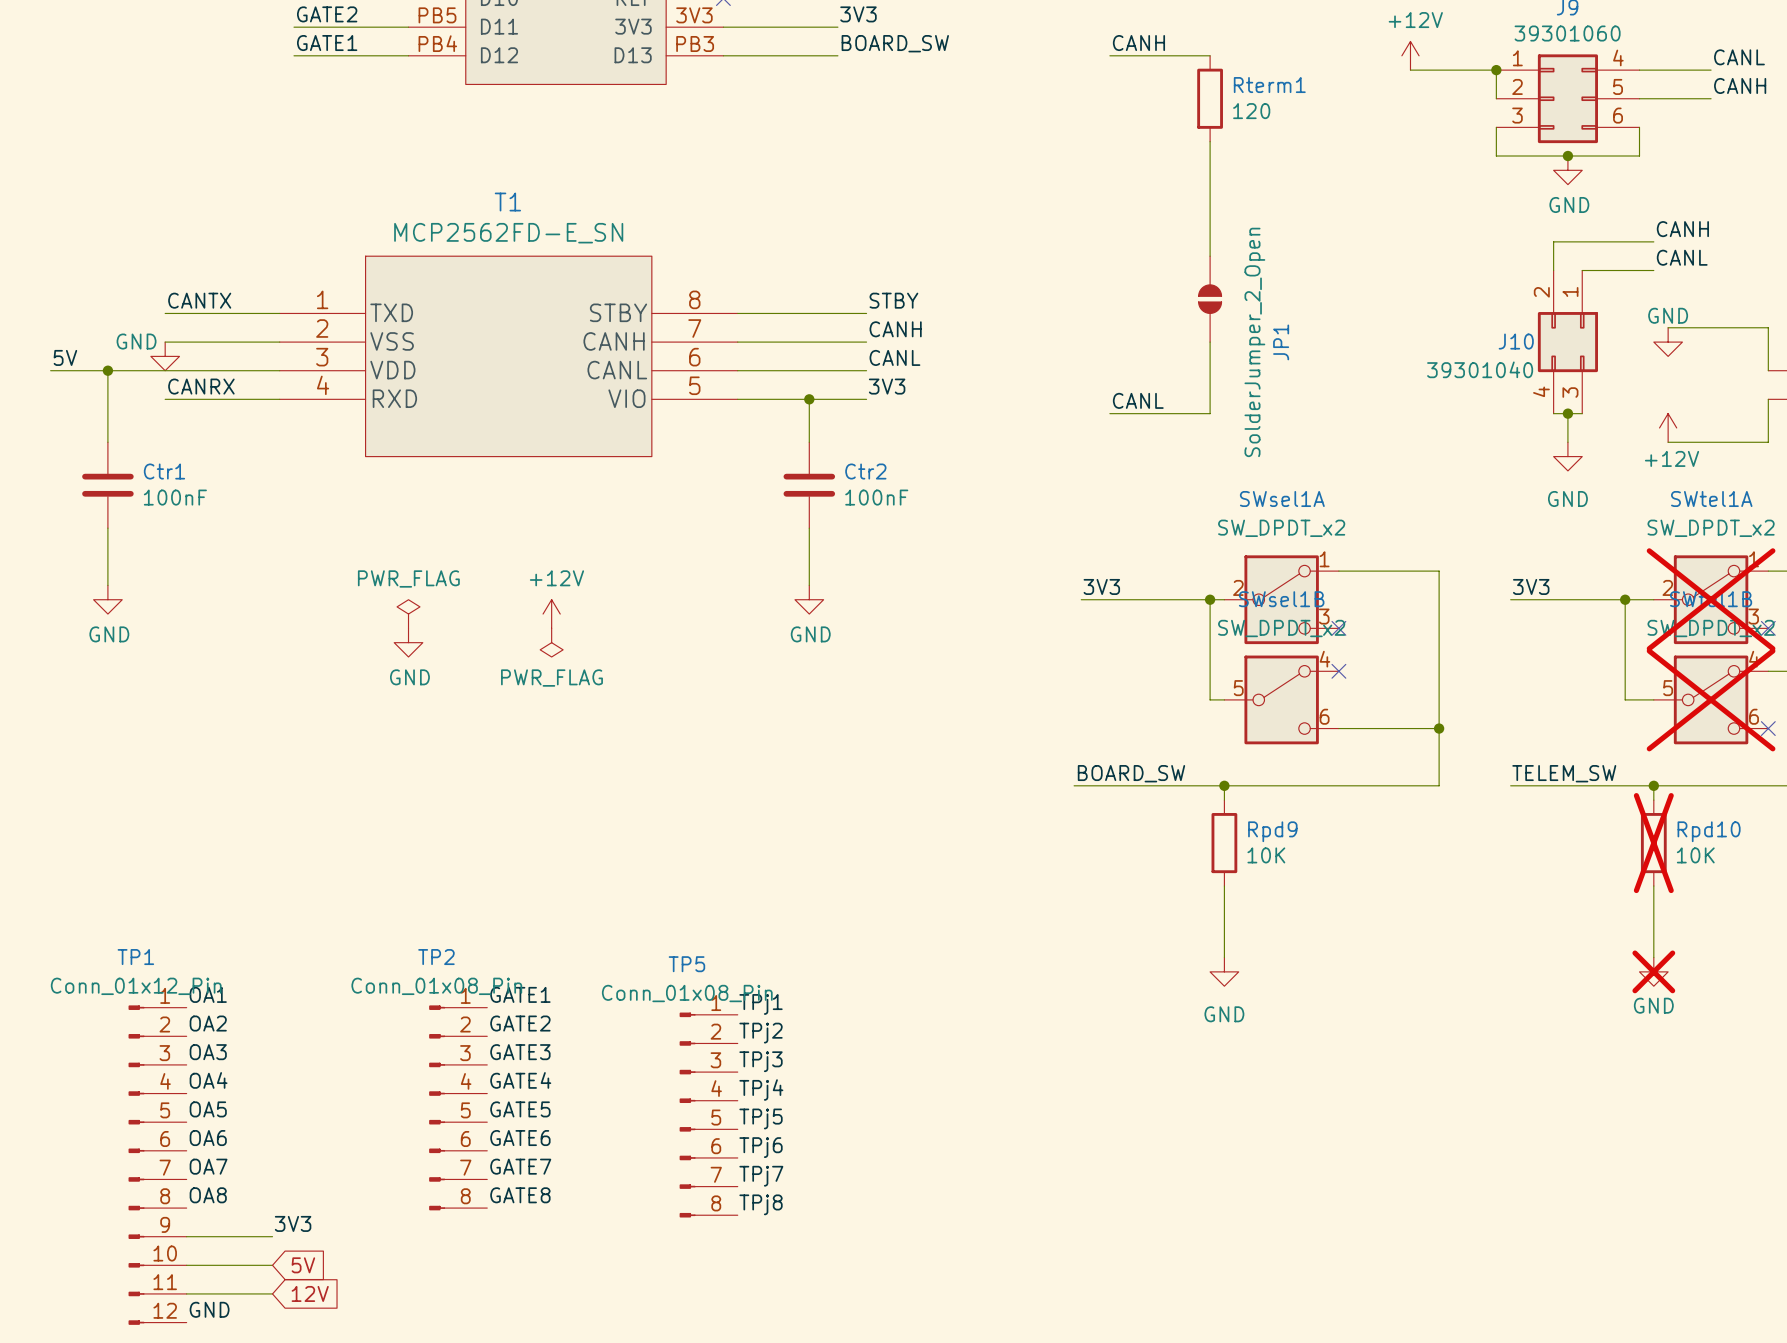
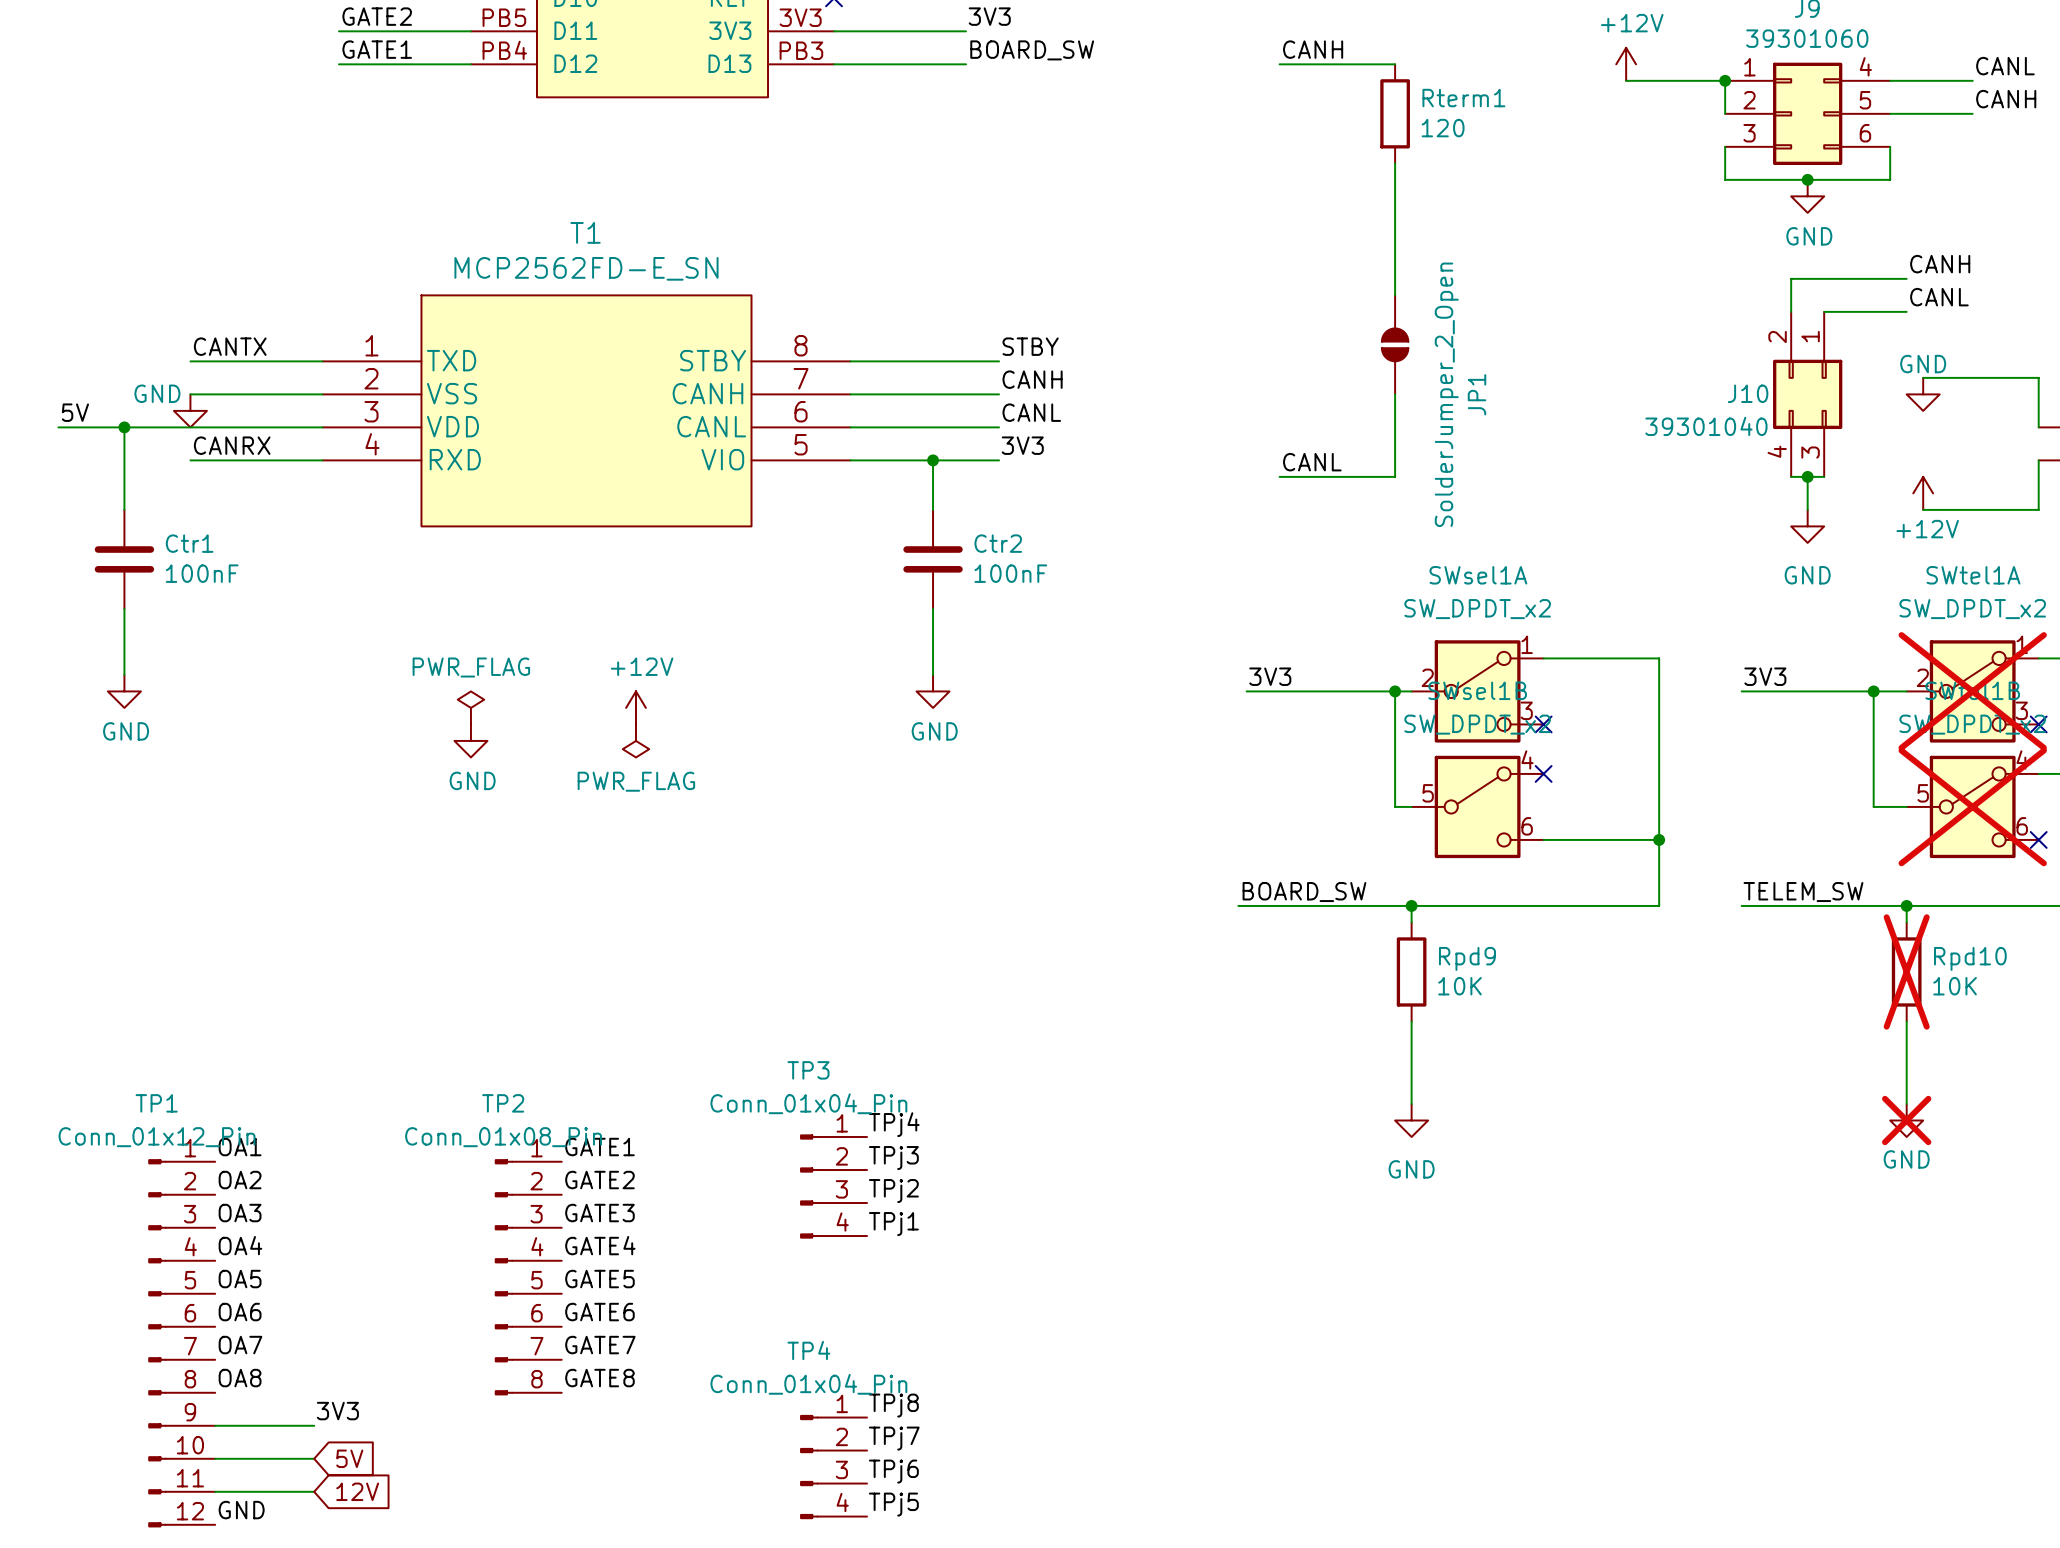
label position: TPj1 (761, 1004) -> TPj1 (893, 1224)
TP3: none -> Conn_01x04_Pin (833, 1186)
label position: TPj2 (761, 1033) -> TPj2 (893, 1191)
label position: TPj3 (761, 1061) -> TPj3 (893, 1158)
label position: TPj4 (761, 1089) -> TPj4 (894, 1124)
TP5: Conn_01x08_Pin (708, 1115) -> none
label position: TPj5 (761, 1118) -> TPj5 (893, 1504)
label position: TPj6 (761, 1147) -> TPj6 (893, 1471)
label position: TPj7 (761, 1176) -> TPj7 (894, 1438)
label position: TPj8 (761, 1204) -> TPj8 (893, 1405)
TP4: none -> Conn_01x04_Pin (833, 1467)

